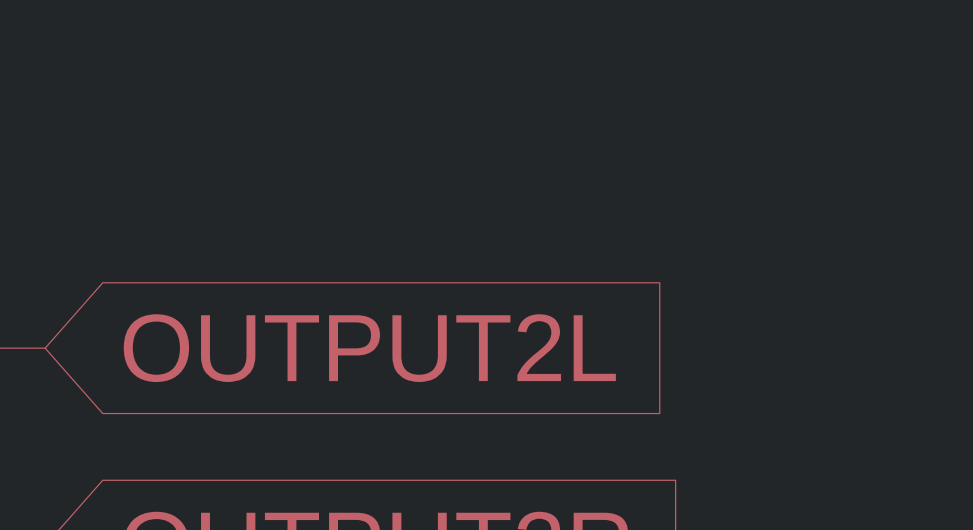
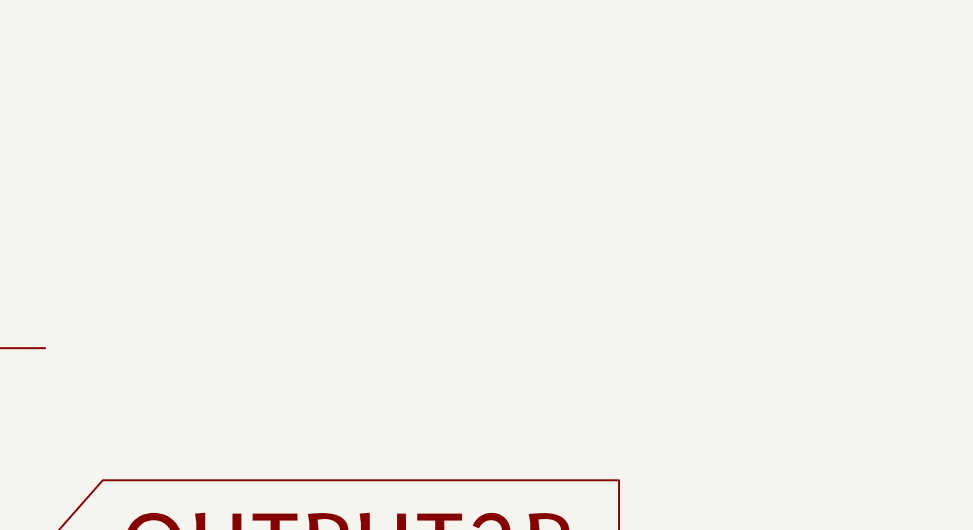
global label: OUTPUT2L (369, 348) -> none

